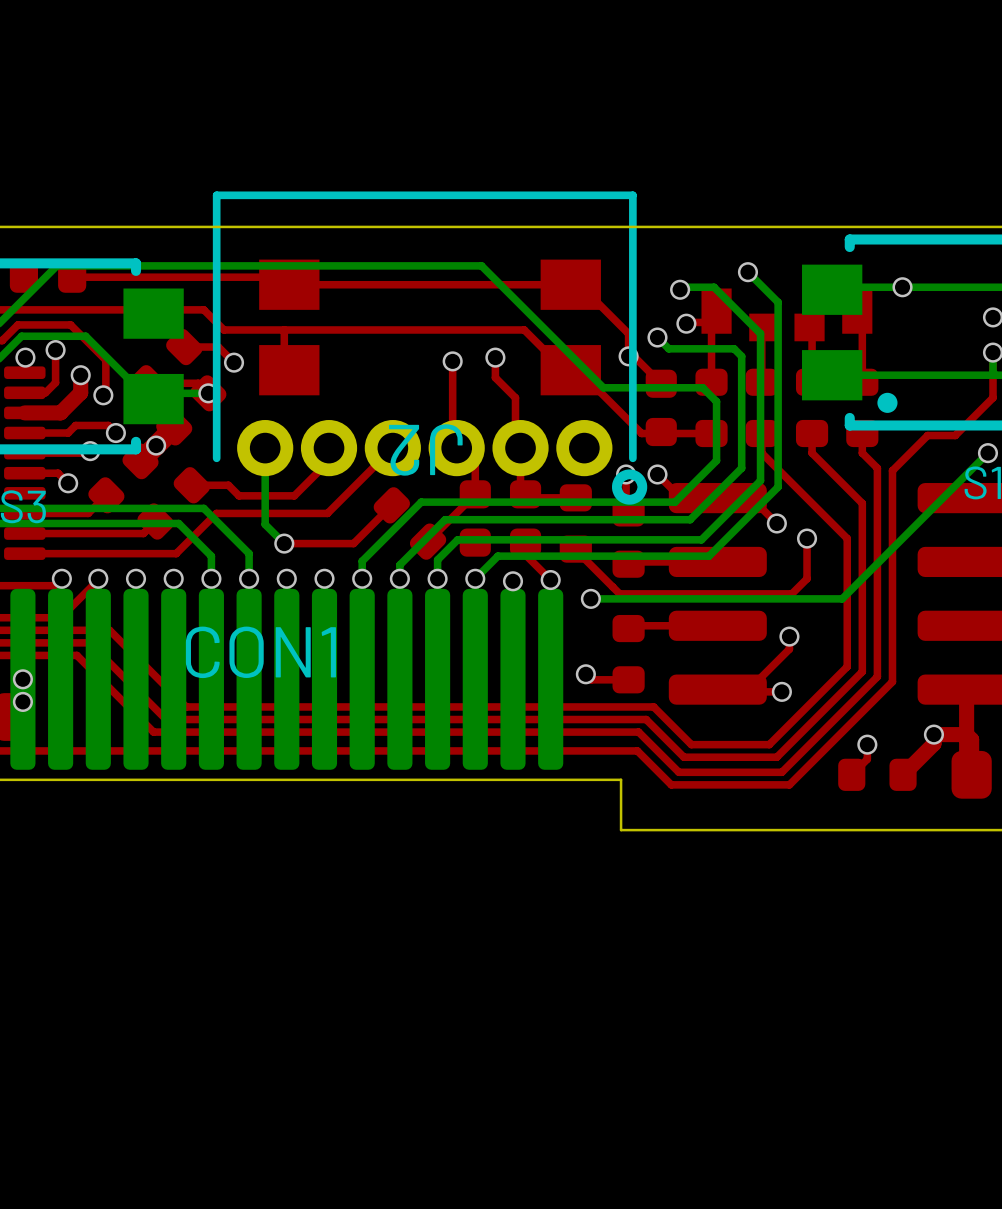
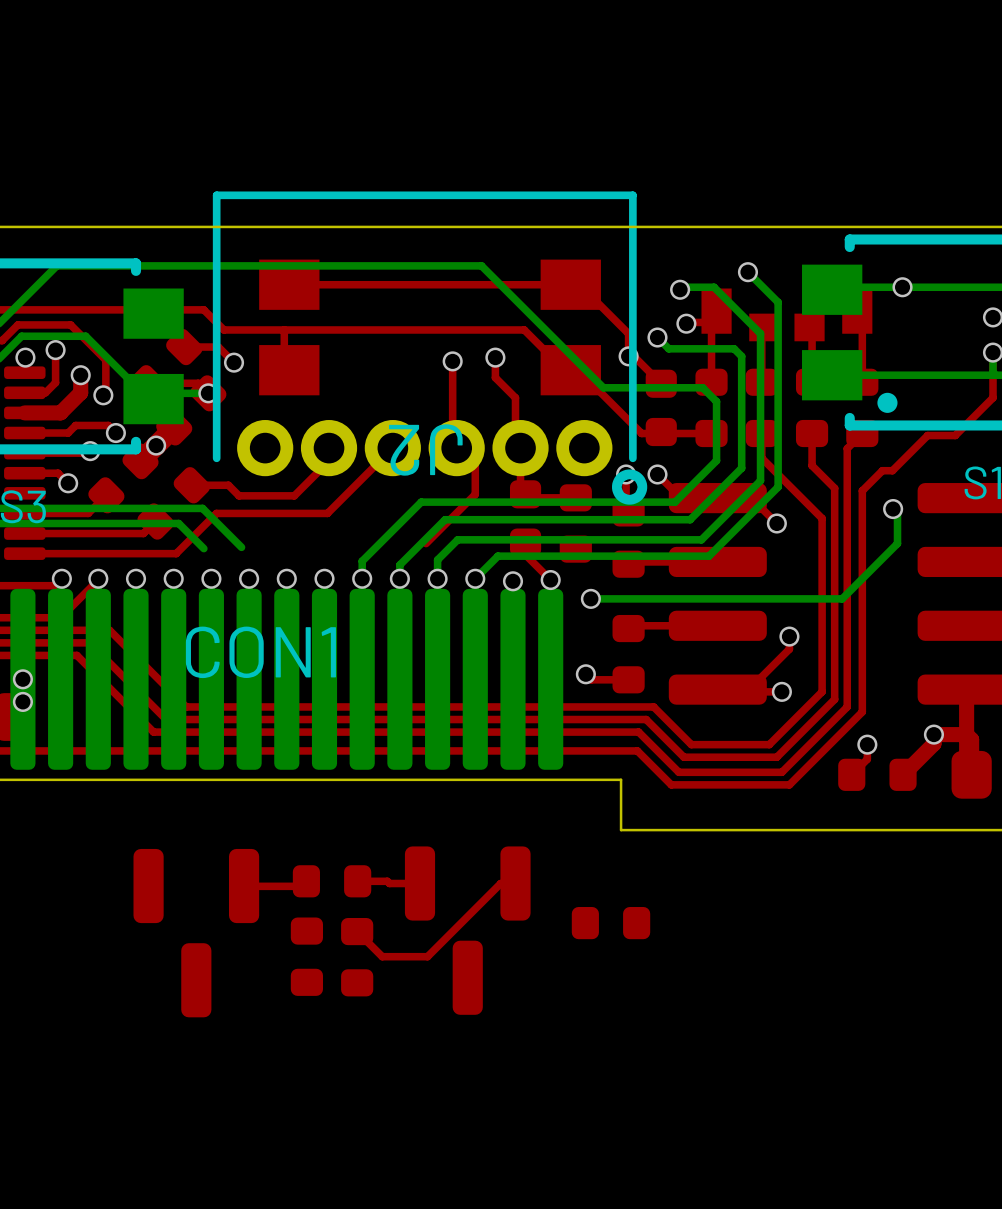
part: (48, 277) -> none
top track: (72, 277) (281, 277) (289, 284) -> none
top track: (862, 433) (862, 453) (877, 468) (877, 676) (847, 706) -> none
bottom track: (265, 448) (265, 524) (284, 543) -> none
top track: (761, 453) (847, 538) -> (862, 433) (847, 448) (847, 538)
top track: none -> (761, 453) (761, 458) (822, 518) (822, 691)
top track: (812, 453) (862, 503) -> (892, 470) (882, 470) (862, 490) (862, 503)
top track: none -> (812, 453) (812, 465) (834, 488) (834, 699)
bottom track: (987, 453) (897, 543) -> (893, 509) (897, 513) (897, 543)
via: (987, 453) -> none
top track: (892, 470) (892, 681) (862, 711) -> none
top track: (391, 505) (353, 543) (284, 543) -> none
bottom track: (202, 508) (249, 553) (249, 578) -> (202, 508) (241, 547)
via: none -> (893, 509)
part: (475, 518) -> none
part: (409, 523) -> none
top track: (807, 538) (807, 578) (791, 593) (619, 593) (575, 550) -> none
via: (807, 538) -> none
via: (284, 543) -> none
bottom track: (203, 548) (211, 556) (211, 578) -> none
top track: (847, 666) (822, 691) -> (847, 666) (847, 706)
top track: (862, 671) (834, 699) -> (862, 671) (862, 711)
top track: none -> (306, 881) (301, 886) (244, 886)
part: none -> (332, 881)
top track: none -> (357, 881) (420, 883)
top track: none -> (515, 883) (500, 883) (427, 956) (382, 956) (357, 931)
part: none -> (611, 923)
part: none -> (467, 930)
part: none -> (196, 933)
part: none -> (306, 956)
part: none -> (357, 957)

